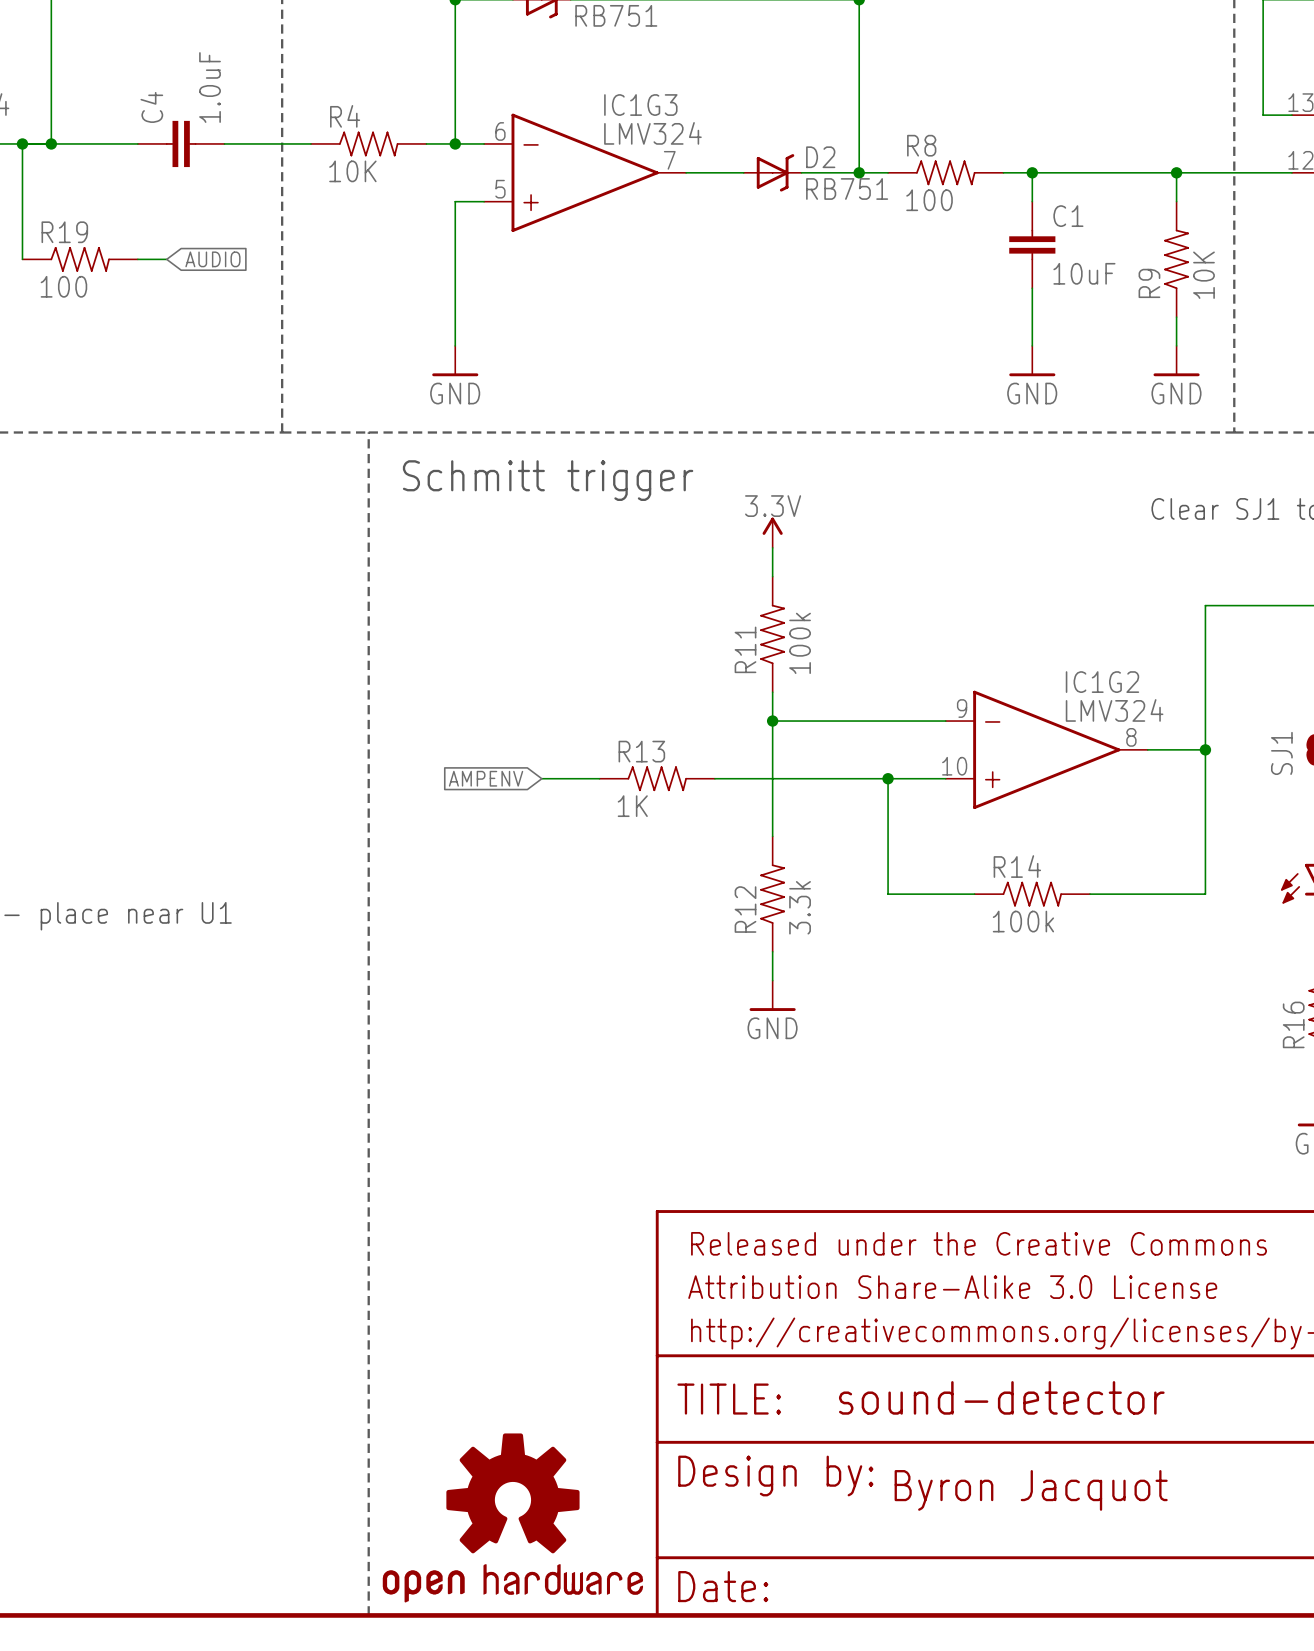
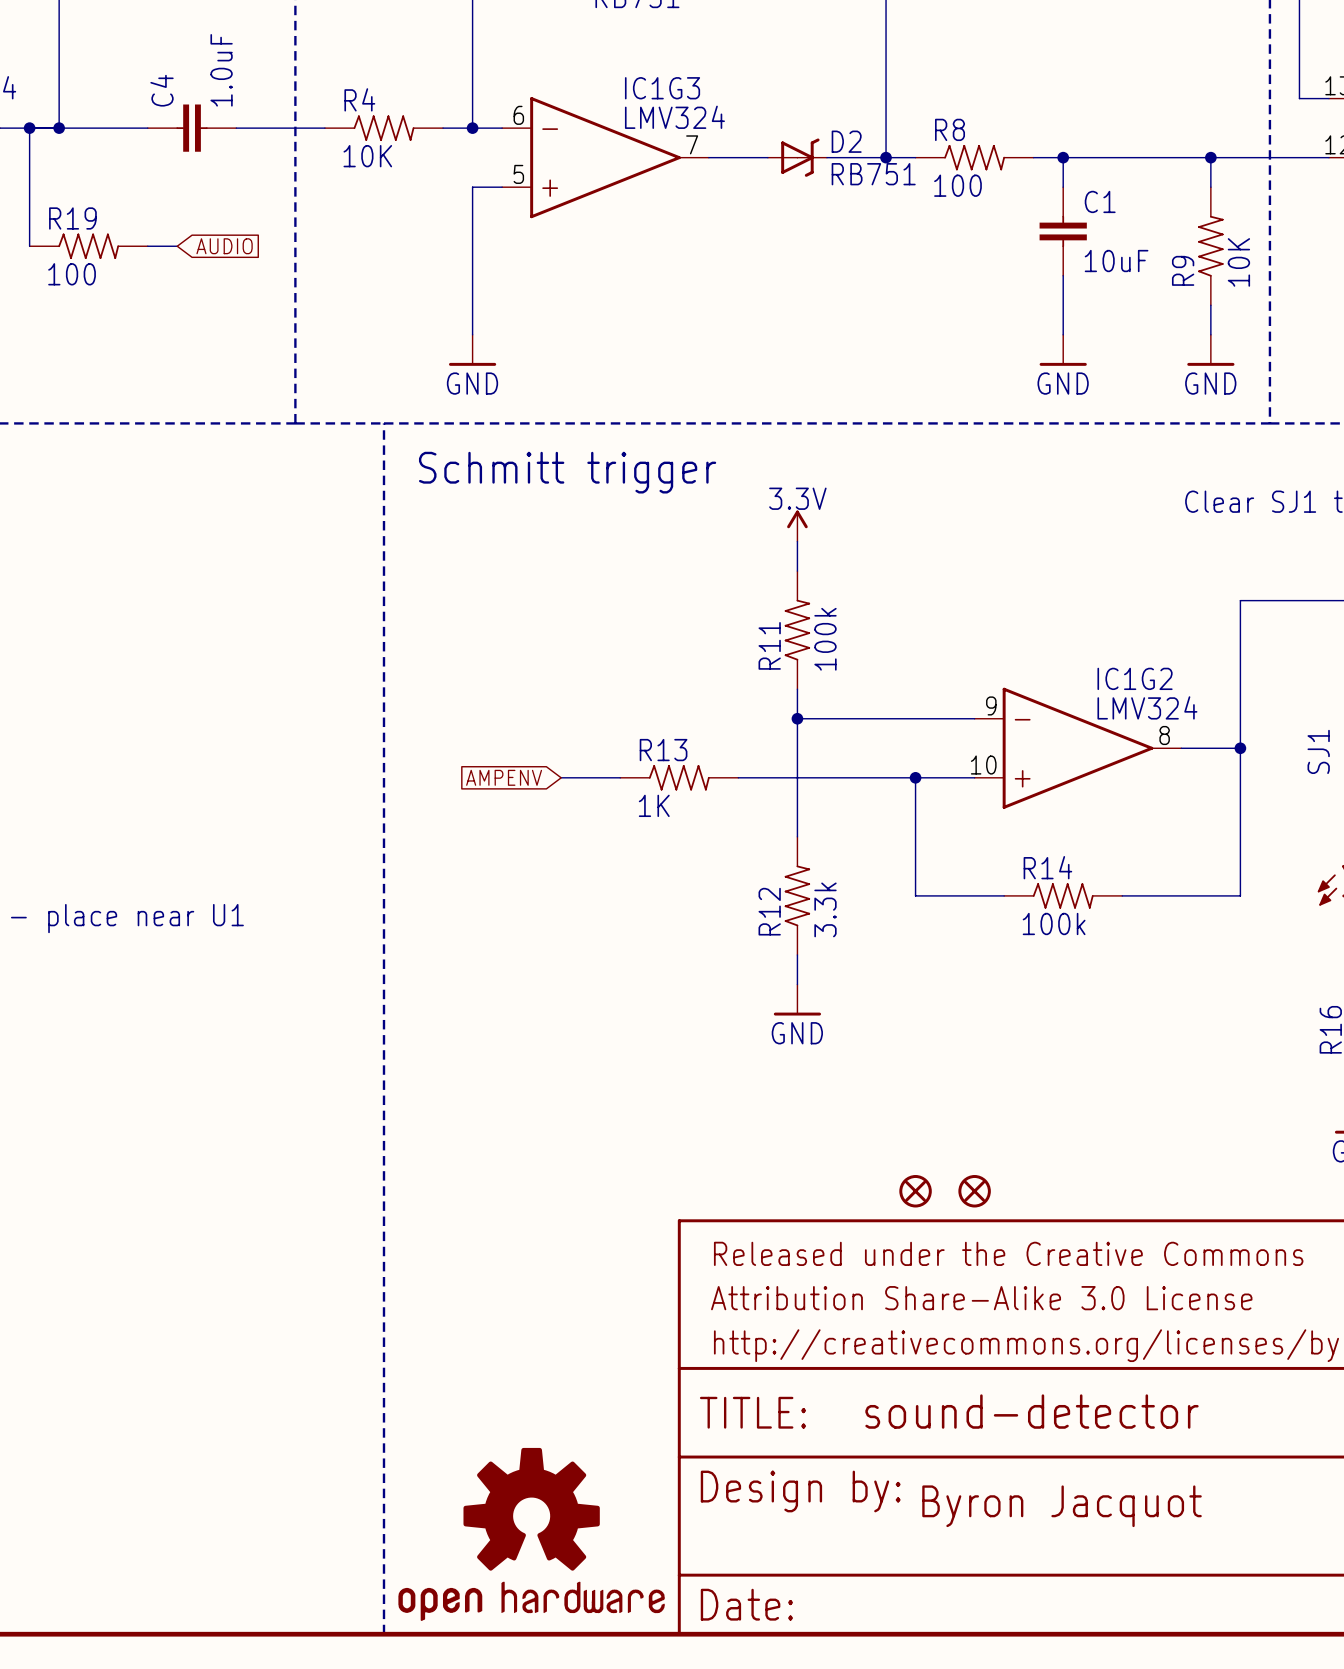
part: none -> (915, 1191)
part: none -> (974, 1191)

